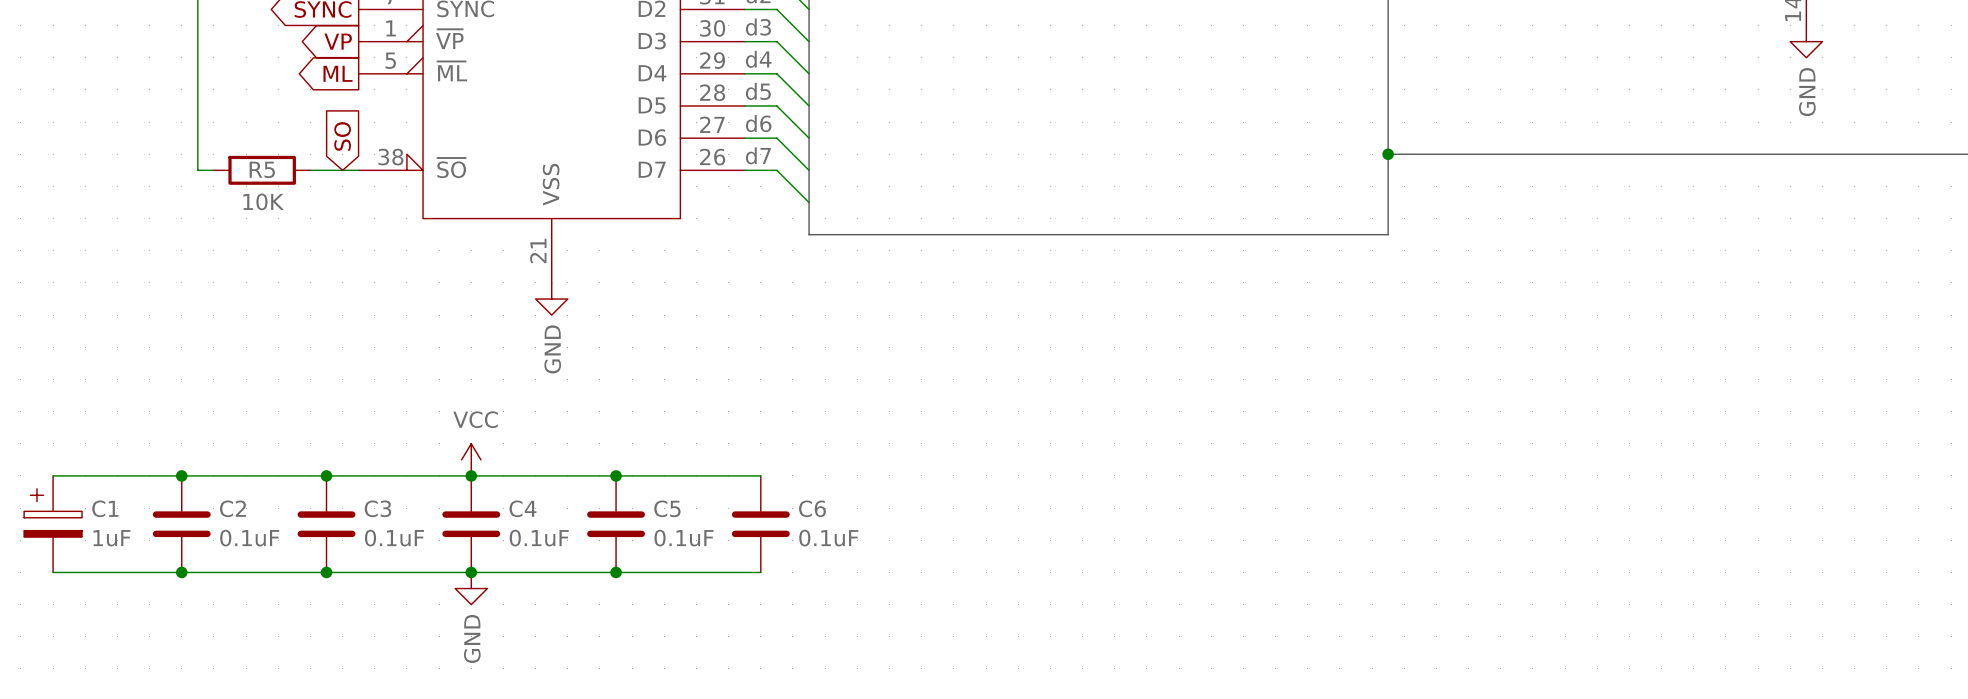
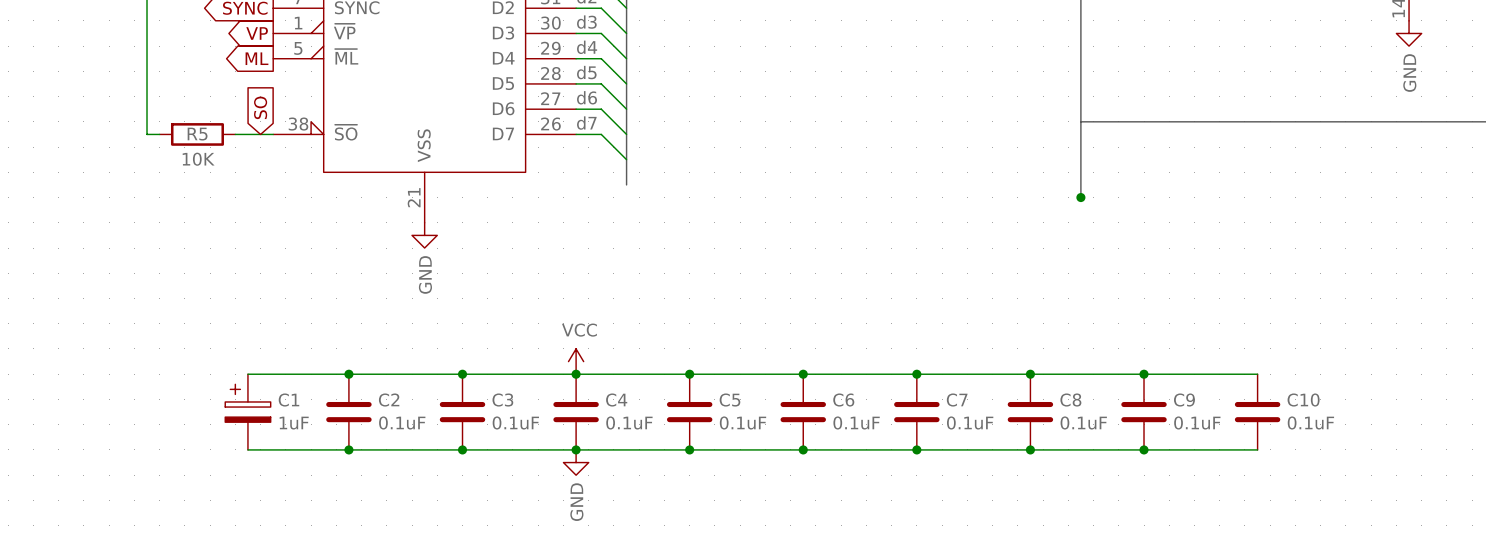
junction: (1388, 154) -> none
bus: (809, 234) (1388, 234) -> (1080, 197) (1080, 184)
junction: none -> (1080, 197)
power symbol position: VCC (471, 459) -> VCC (576, 361)
wire: (53, 475) (326, 475) -> none
junction: (181, 475) -> none
junction: (326, 475) -> none
junction position: (471, 475) -> (348, 374)
junction position: (616, 475) -> (462, 374)
junction: none -> (576, 374)
wire: none -> (588, 374) (1257, 374)
junction: none -> (689, 374)
junction: none -> (803, 374)
junction: none -> (916, 374)
junction: none -> (1030, 374)
junction: none -> (1144, 374)
C1 position: (53, 524) -> (247, 412)
C2 position: (181, 524) -> (348, 412)
C3 position: (326, 524) -> (462, 412)
C4 position: (471, 524) -> (576, 412)
C5 position: (616, 524) -> (689, 412)
C6 position: (760, 524) -> (803, 412)
C7: none -> 0.1uF (916, 412)
C8: none -> 0.1uF (1030, 412)
C9: none -> 0.1uF (1144, 412)
C10: none -> 0.1uF (1257, 412)
wire: (53, 572) (326, 572) -> none
junction: (181, 572) -> none
junction: (326, 572) -> none
junction position: (471, 572) -> (348, 449)
junction position: (616, 572) -> (462, 449)
junction: none -> (576, 449)
wire: none -> (588, 449) (1257, 449)
junction: none -> (689, 449)
junction: none -> (803, 449)
junction: none -> (916, 449)
junction: none -> (1030, 449)
junction: none -> (1144, 449)
power symbol position: GND (471, 588) -> GND (576, 462)

